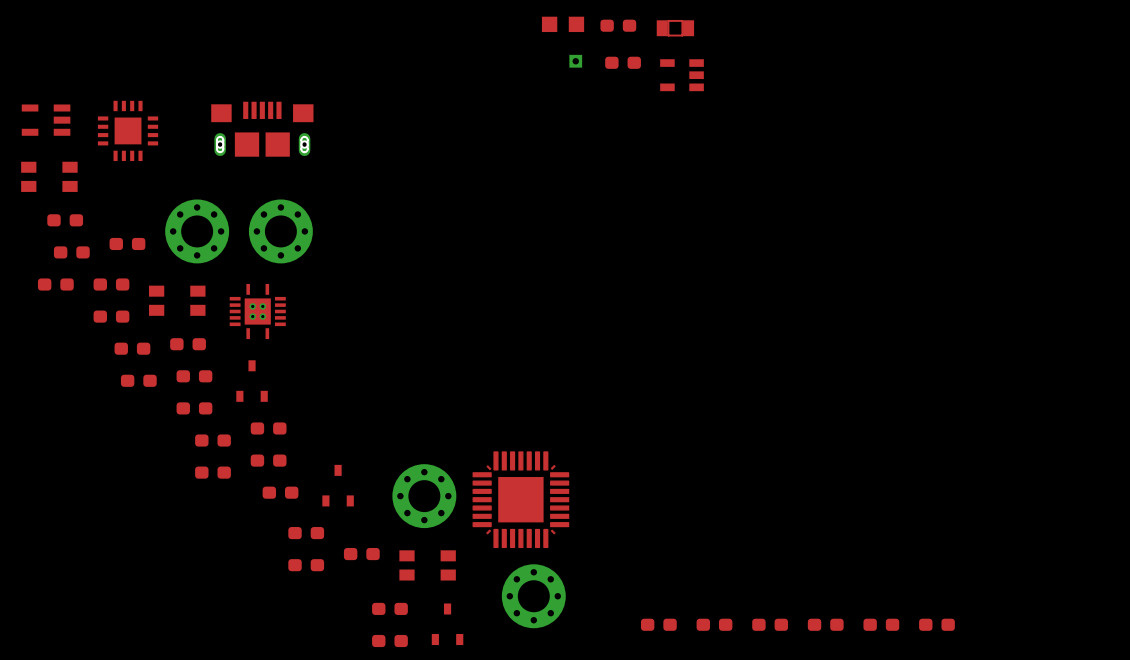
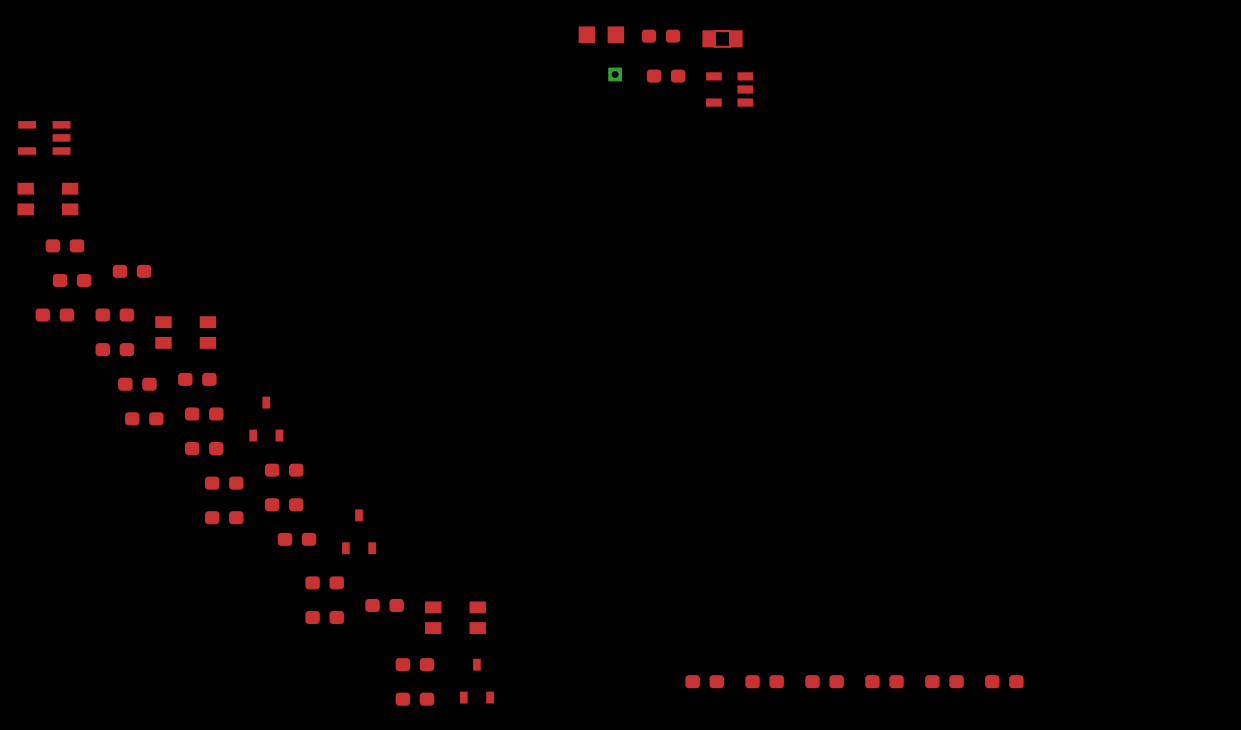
part: (262, 129) -> none
part: (128, 130) -> none
part: (197, 231) -> none
part: (280, 231) -> none
part: (257, 311) -> none
part: (424, 496) -> none
part: (520, 499) -> none
part: (533, 596) -> none

